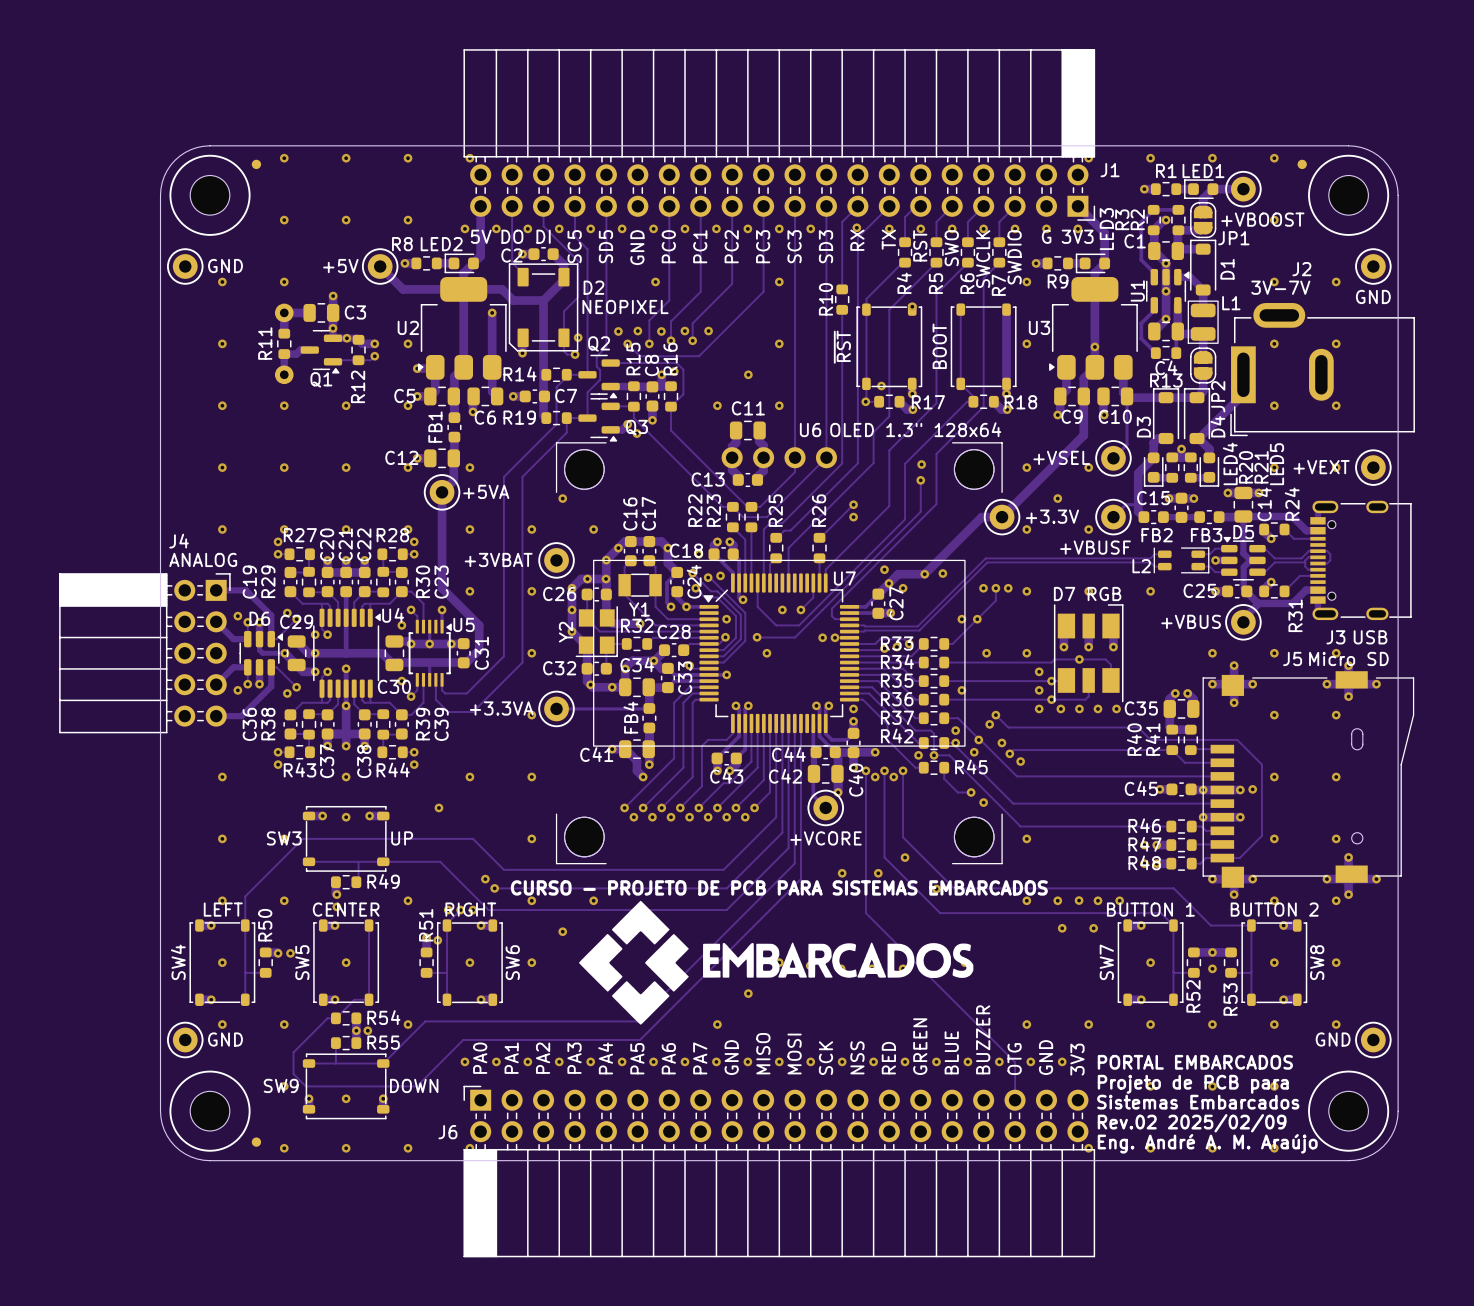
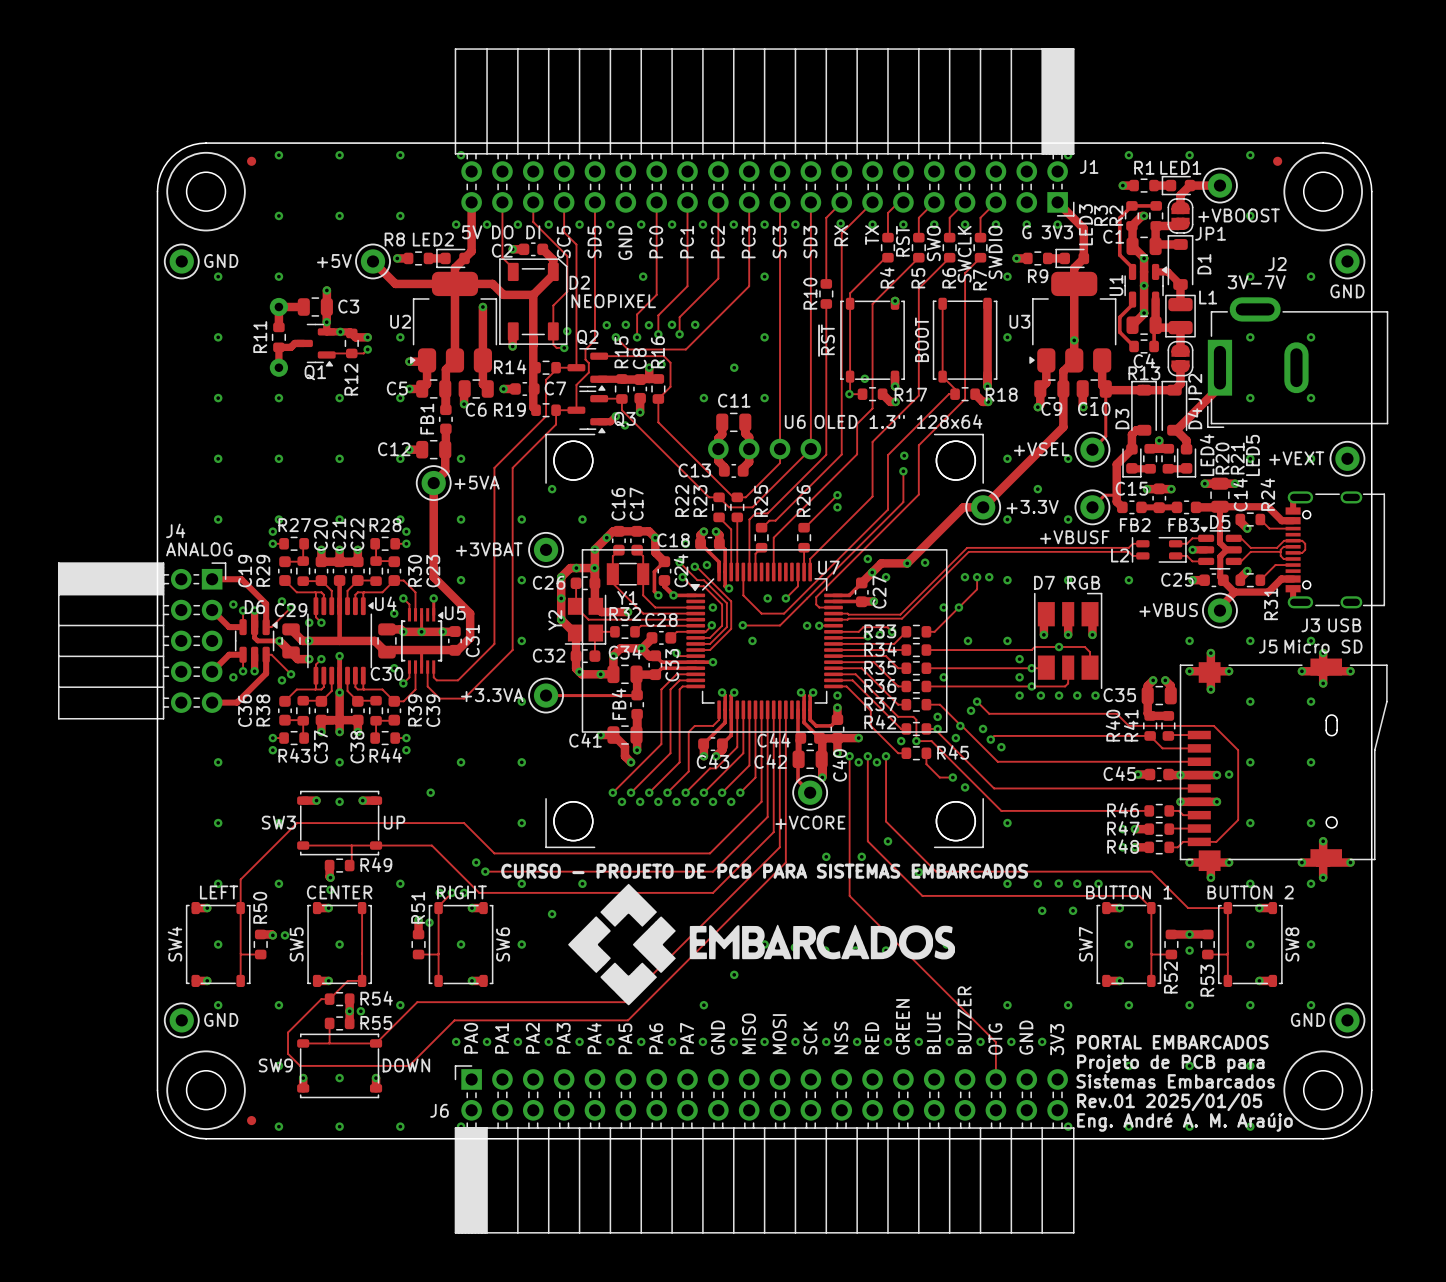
D2 rotation: 0° (543, 307) -> 180° (533, 301)
text: Rev.02 2025/02/09 (1192, 1123) -> Rev.01 2025/01/05 (1169, 1102)

